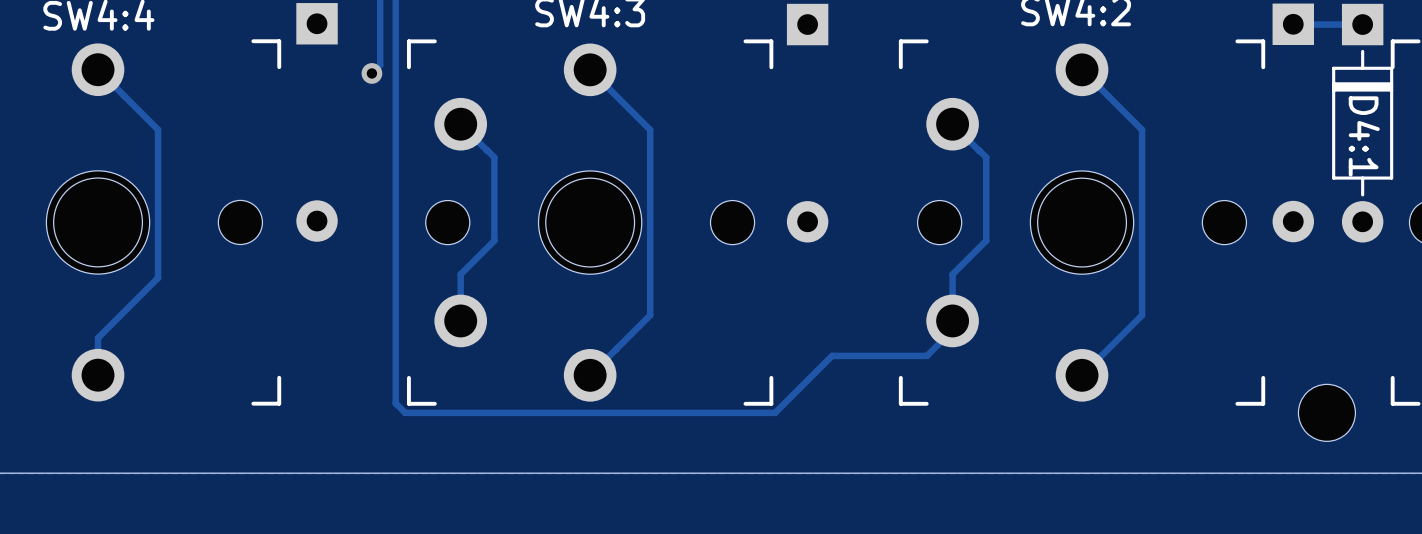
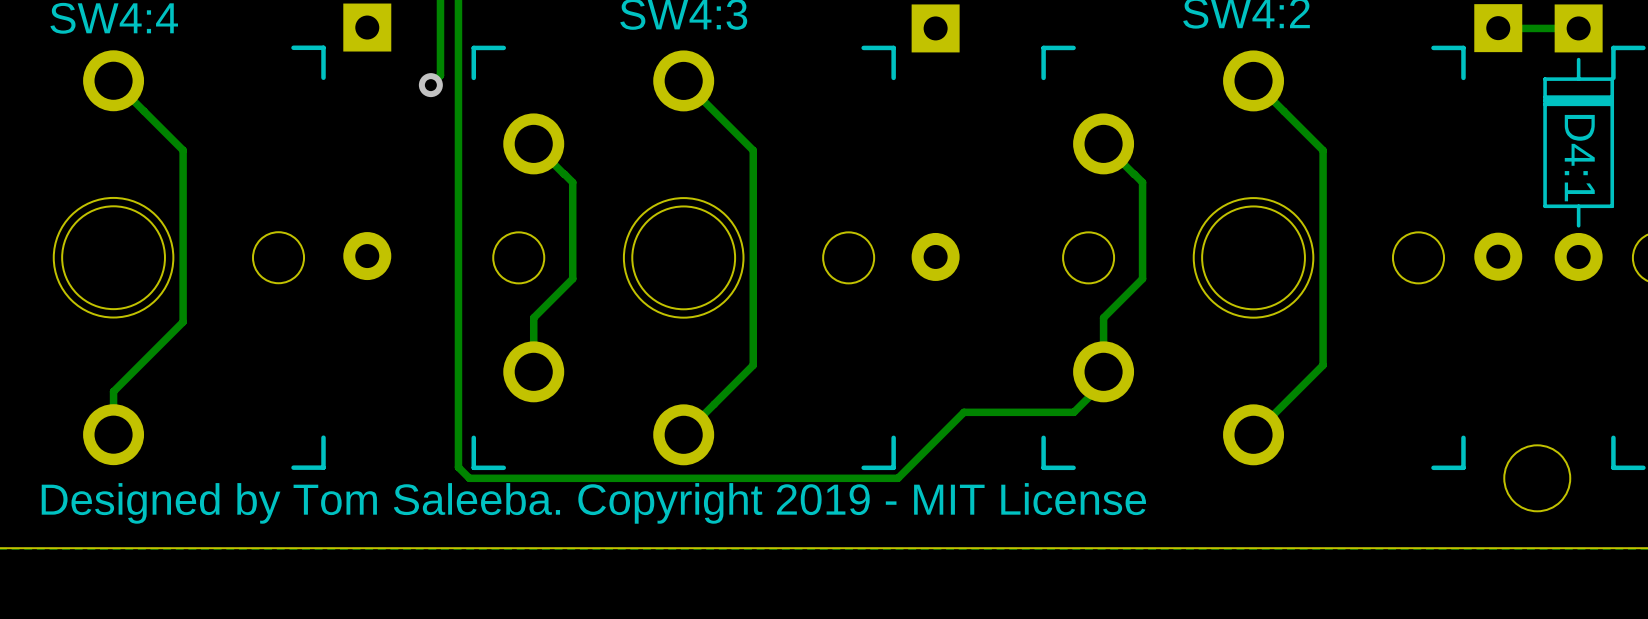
text: none -> Designed by Tom Saleeba. Copyright 2019 - MIT License (593, 503)

